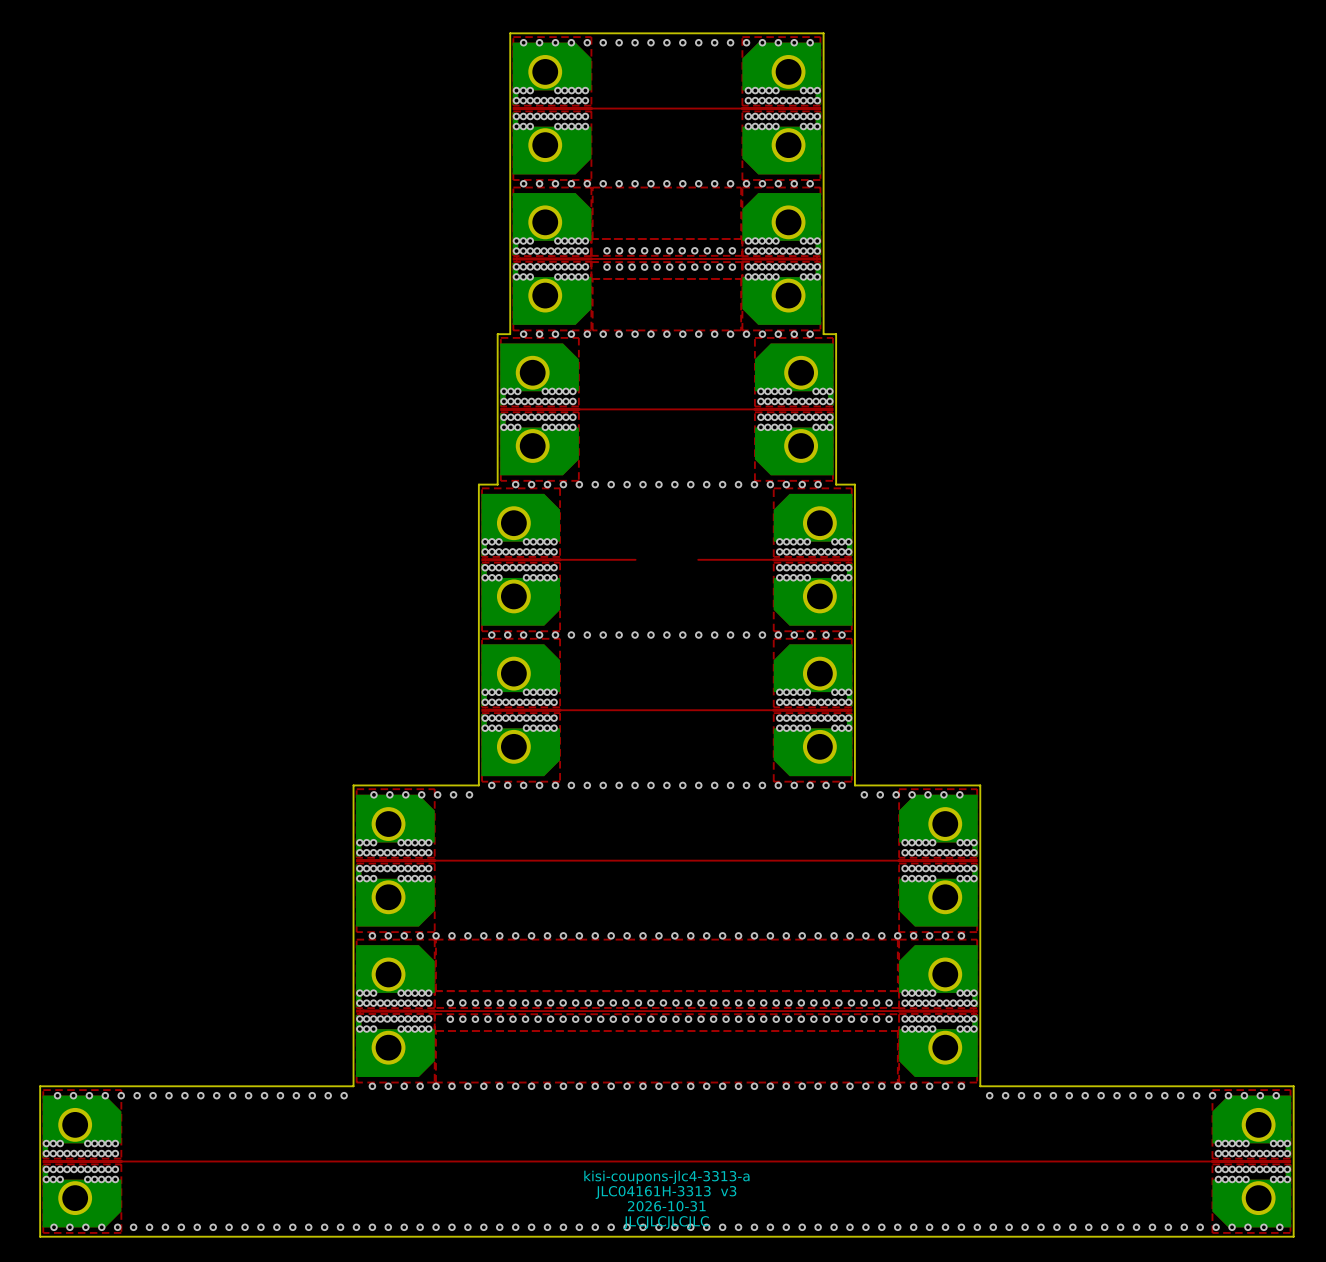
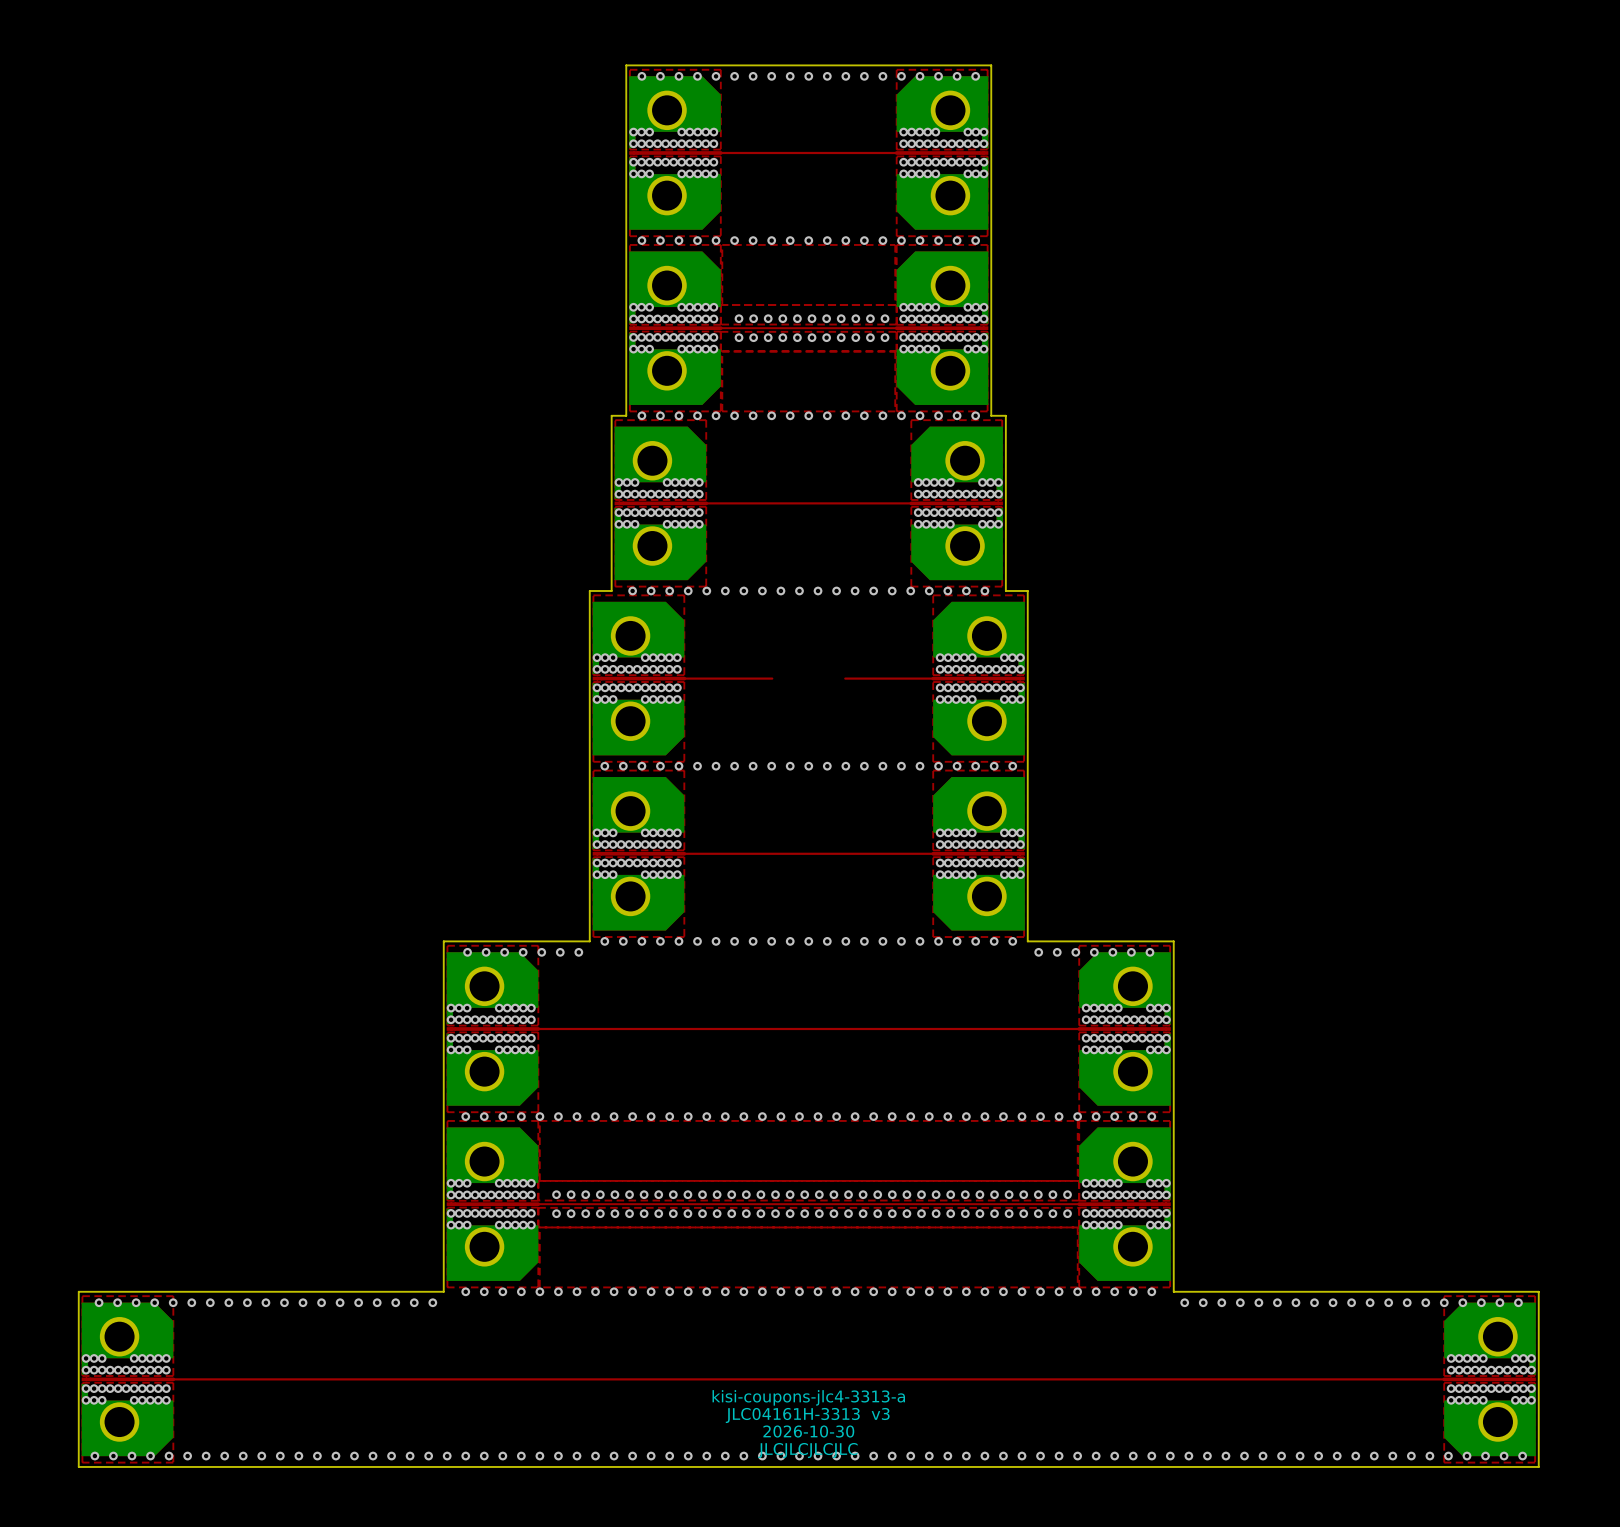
text: 2026-10-31 (666, 1206) -> 2026-10-30 (808, 1431)

